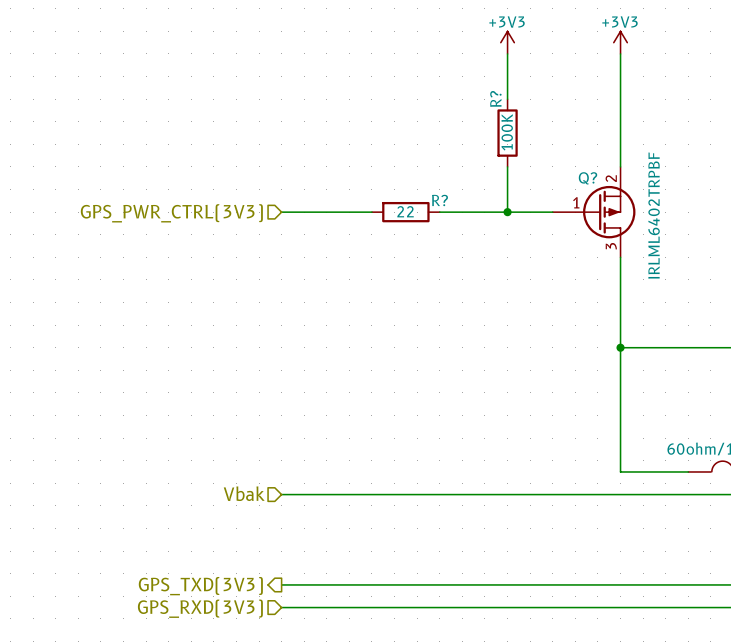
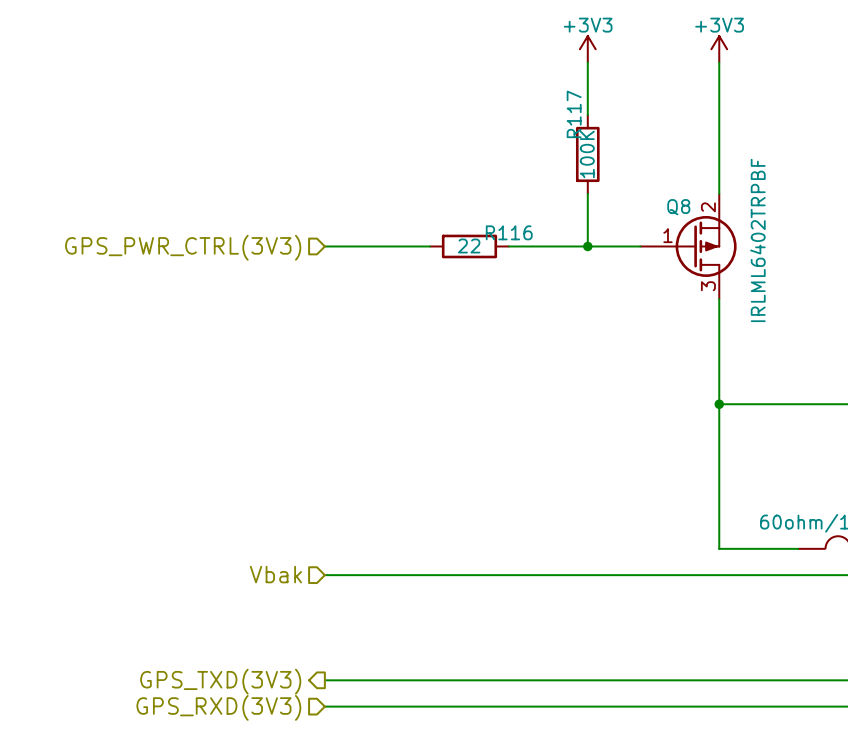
R? name: R? (495, 98) -> R117 (574, 114)
Q? name: Q? (587, 178) -> Q8 (678, 207)
R? name: R? (439, 200) -> R116 (509, 232)

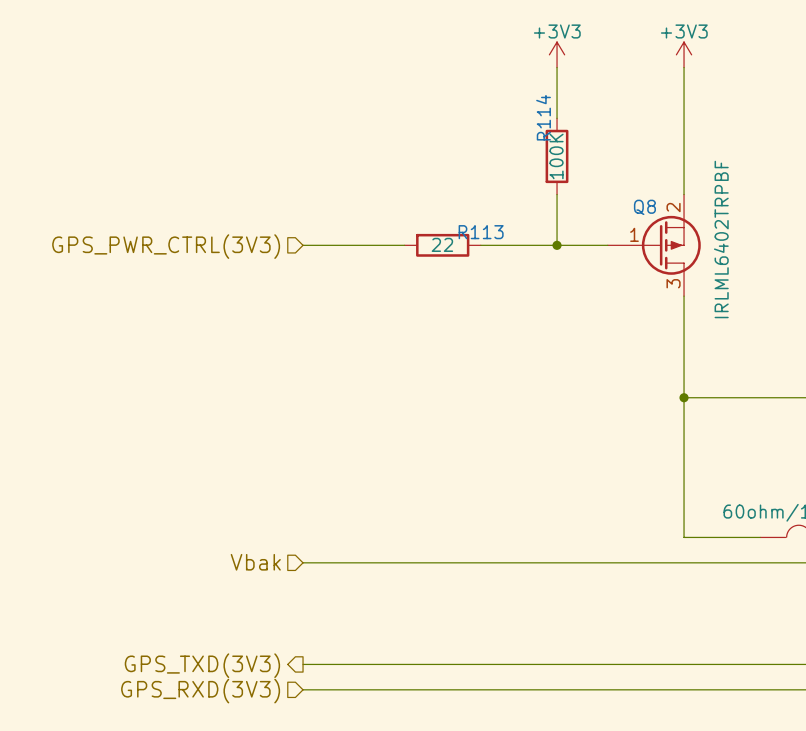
R117 name: R117 (574, 114) -> R114 (543, 117)
R116 name: R116 (509, 232) -> R113 (481, 232)

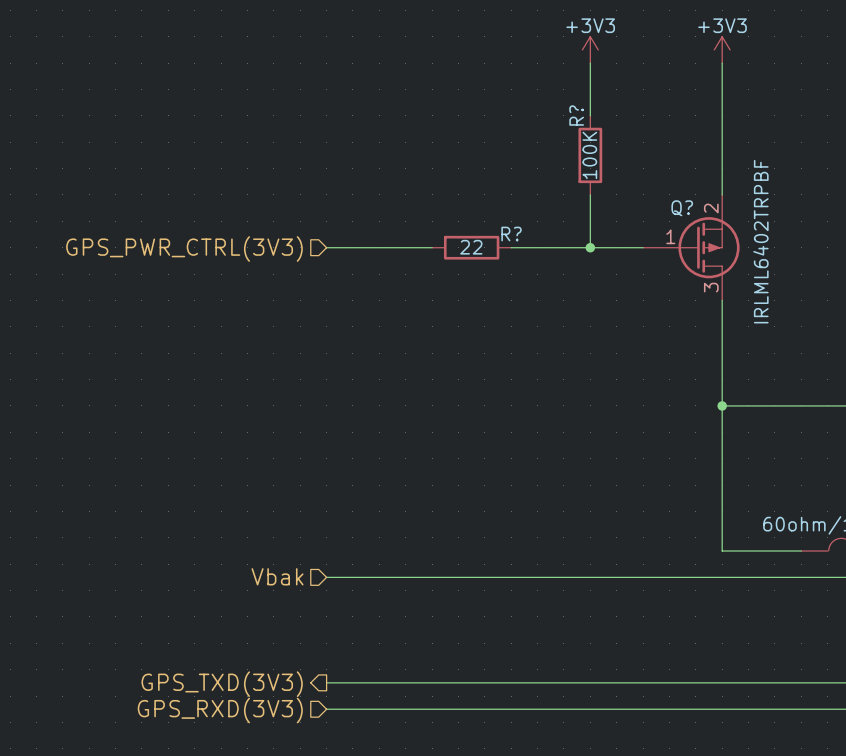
R114 name: R114 (543, 117) -> R? (576, 115)
Q8 name: Q8 (644, 207) -> Q? (682, 208)
R113 name: R113 (481, 232) -> R? (511, 234)

